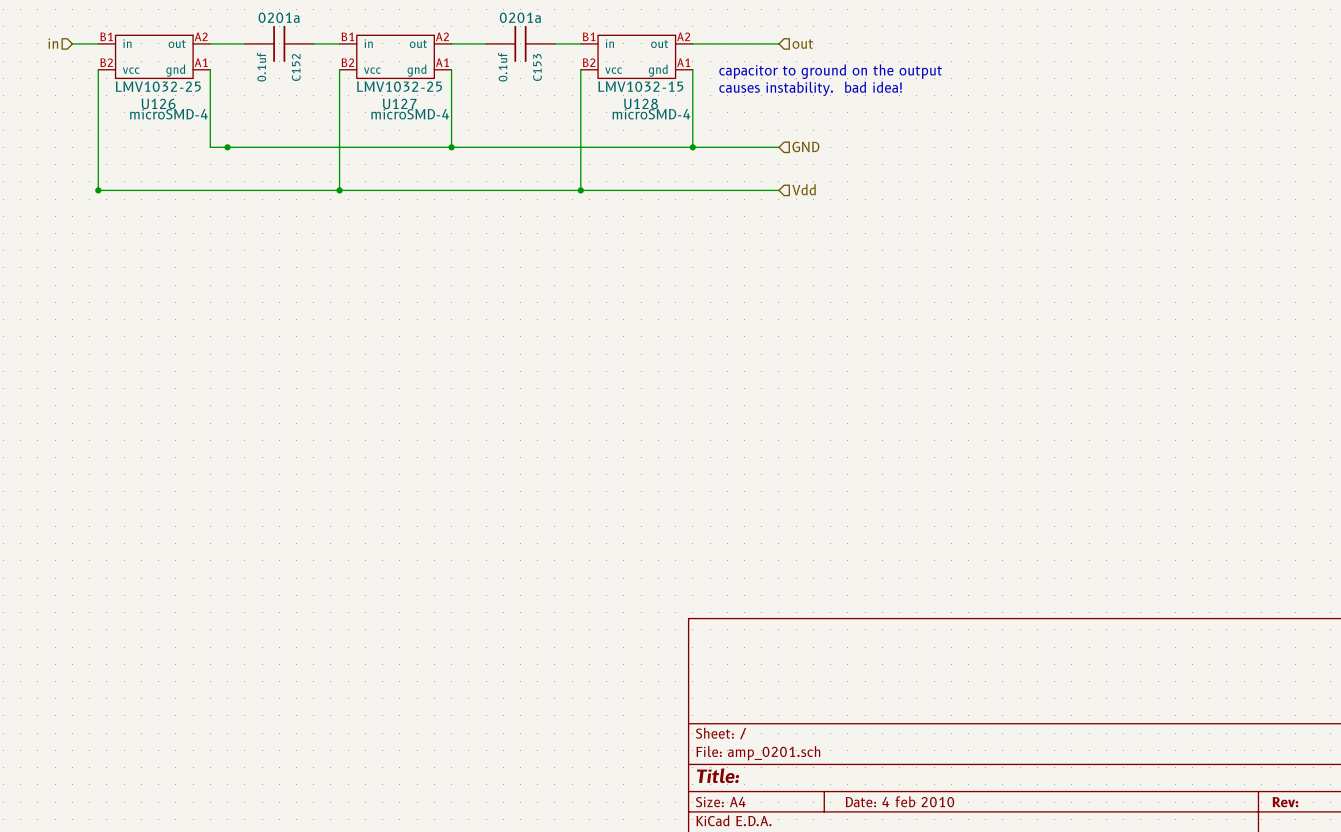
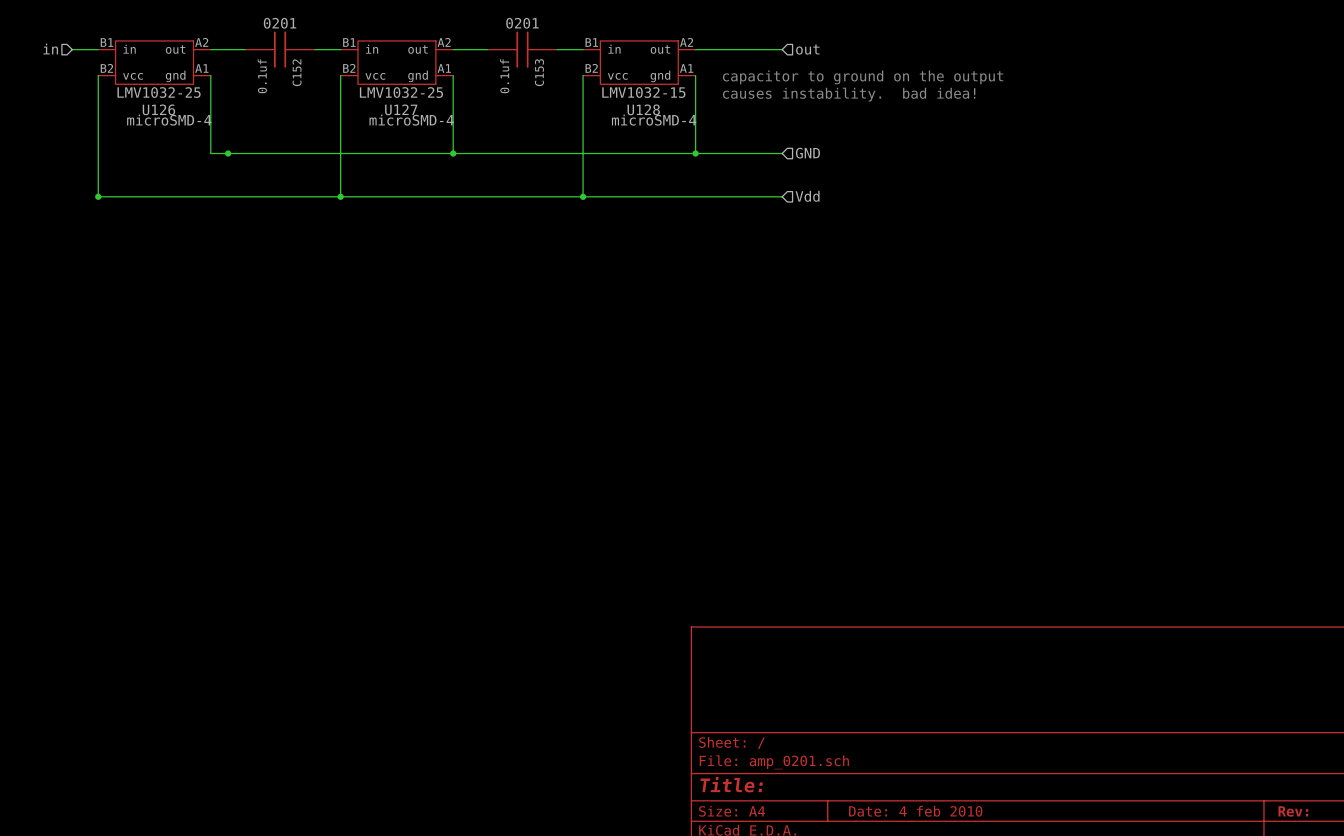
C152 text: 0201a (279, 17) -> 0201 (280, 23)
C153 text: 0201a (520, 17) -> 0201 (522, 23)

